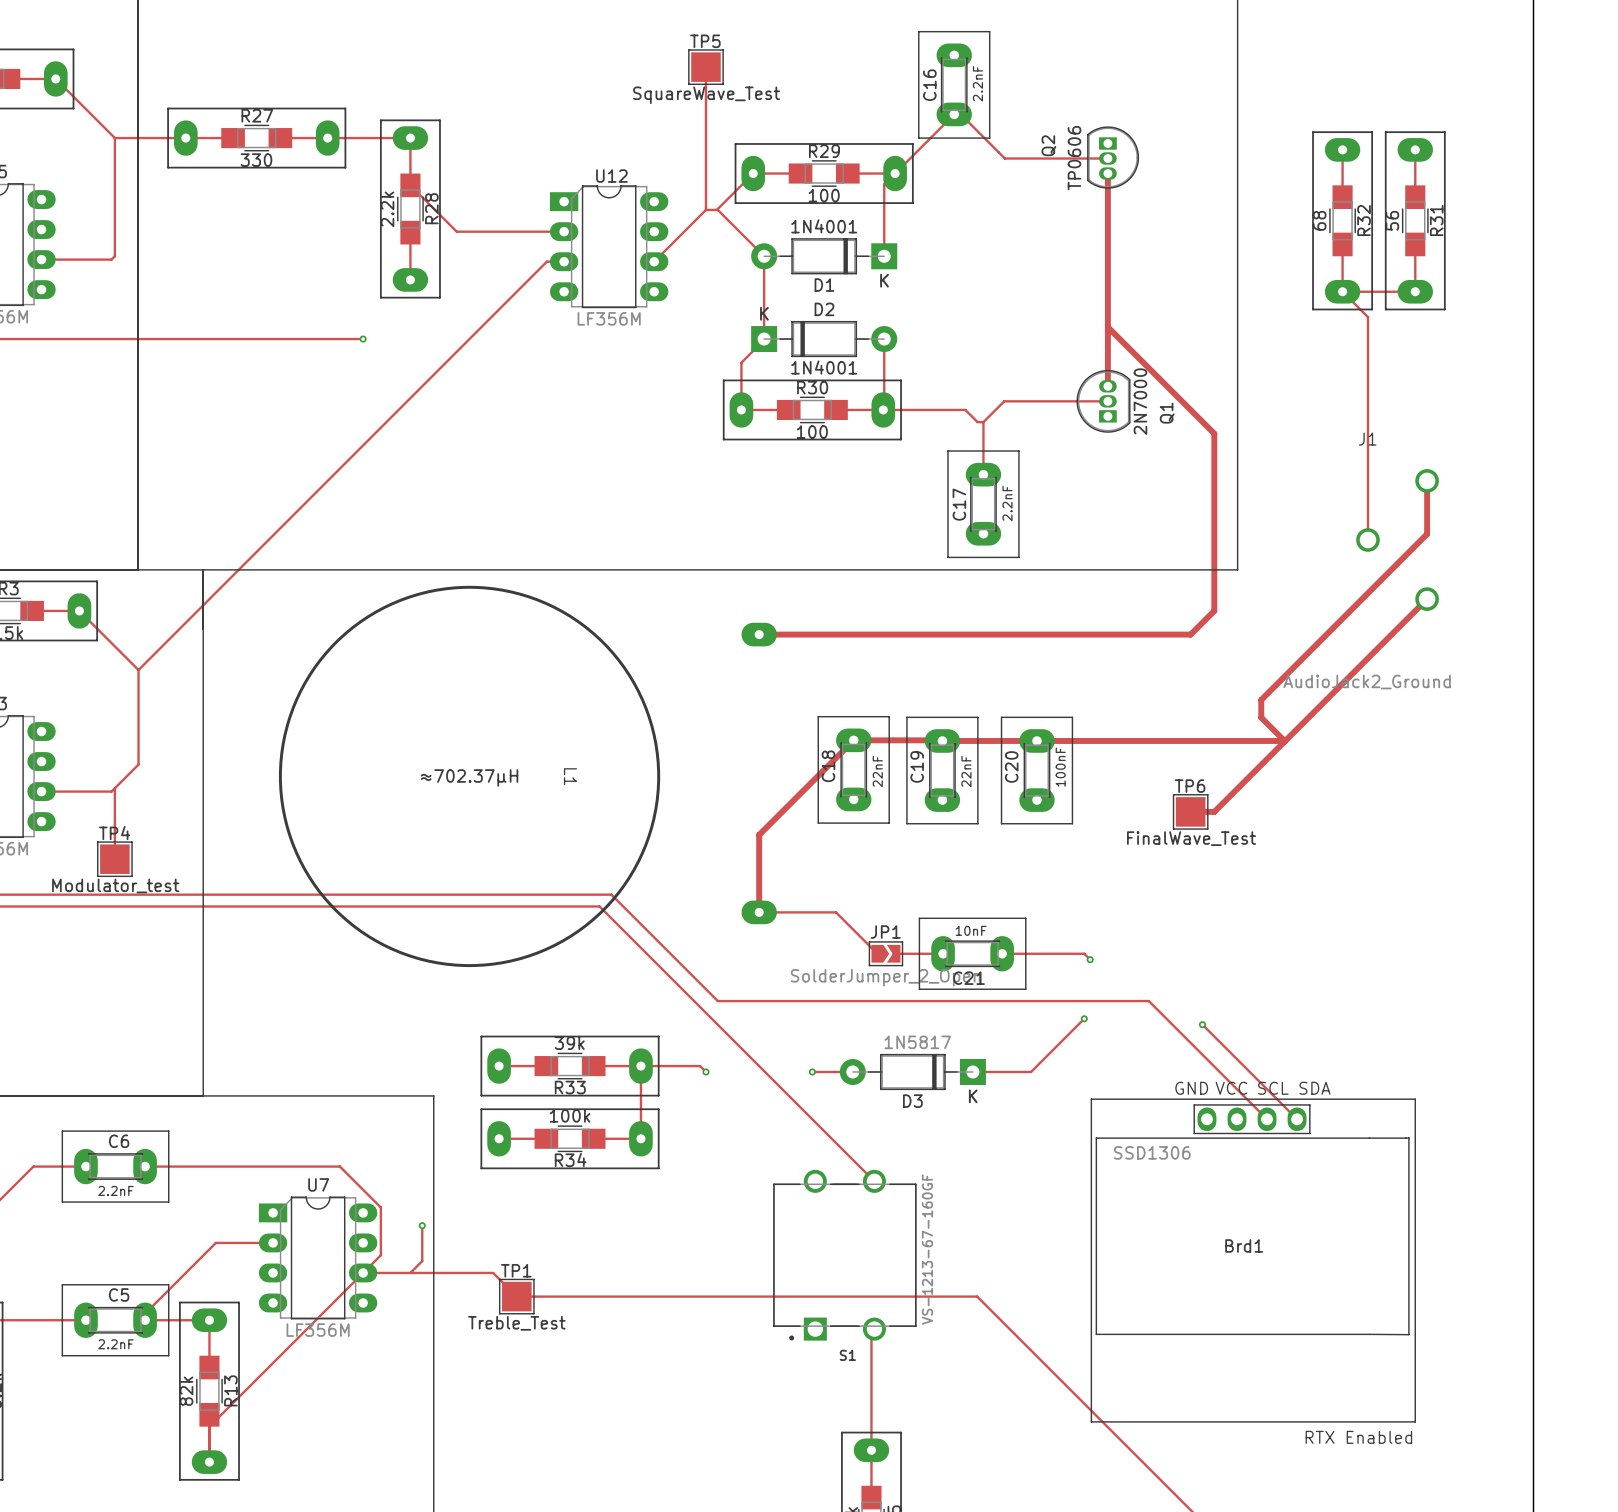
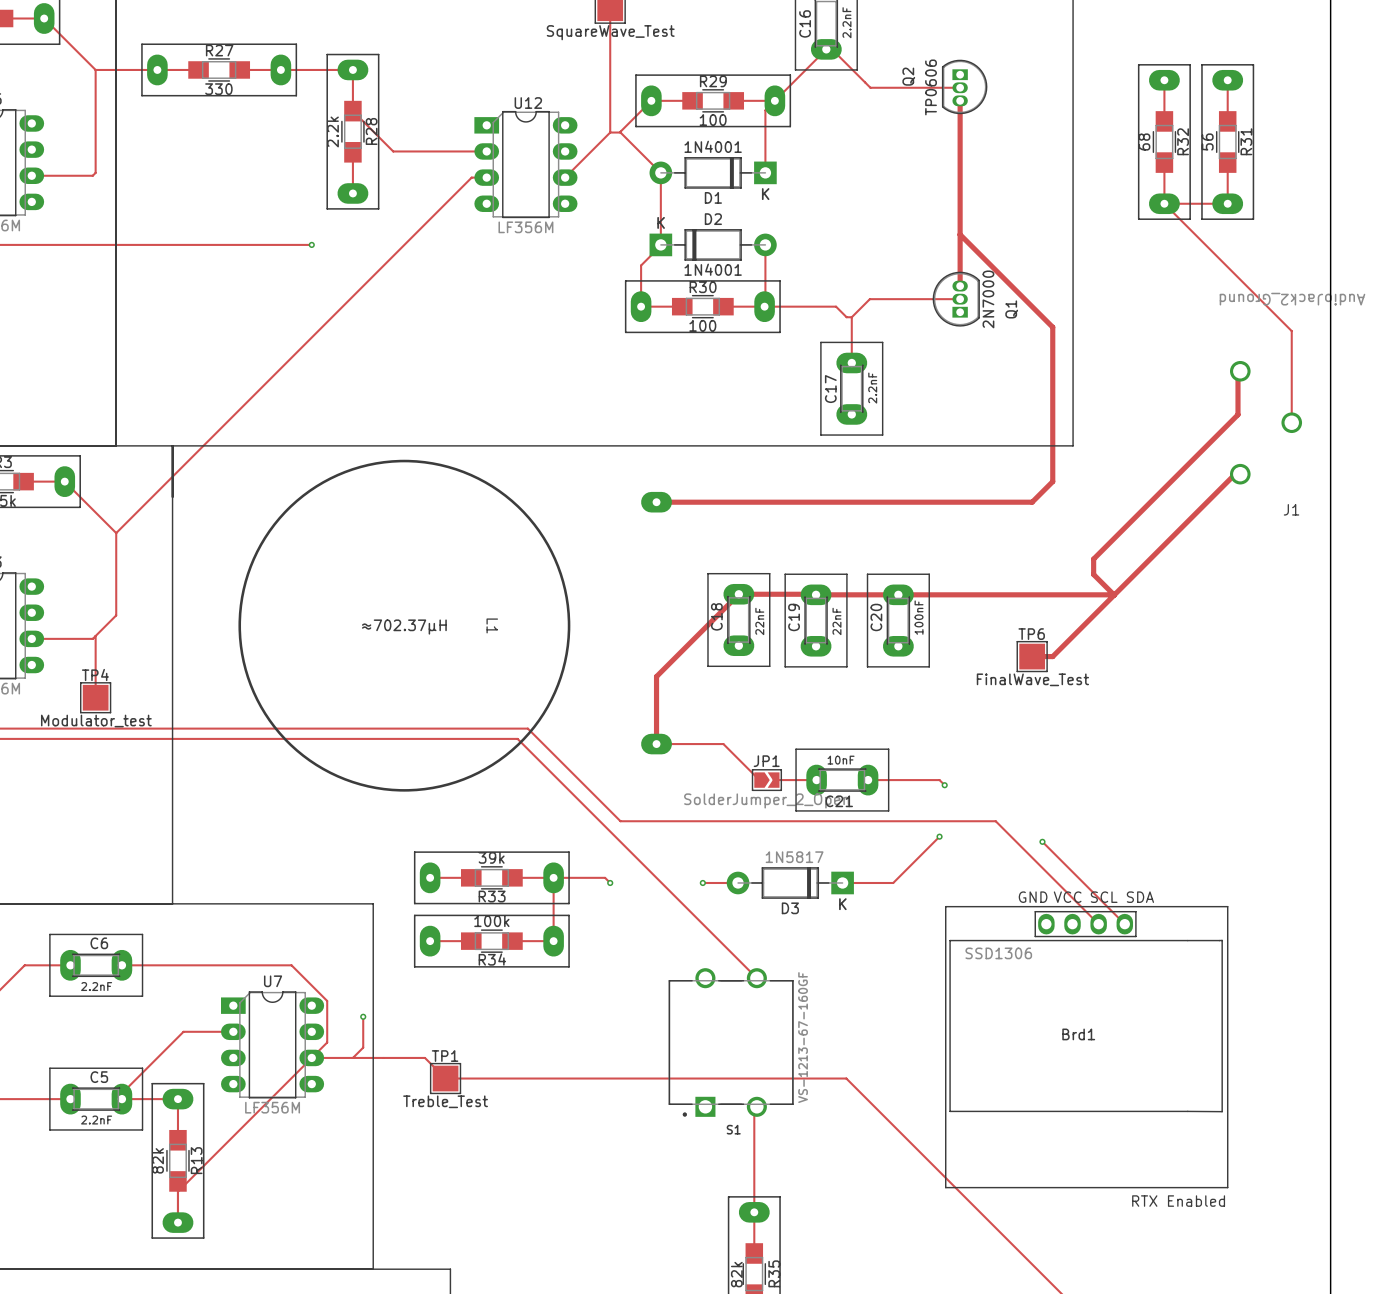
track: (1367, 317) (1367, 540) -> (1186, 225) (1291, 331) (1291, 422)
J1 rotation: 0° (1397, 540) -> 180° (1266, 422)

